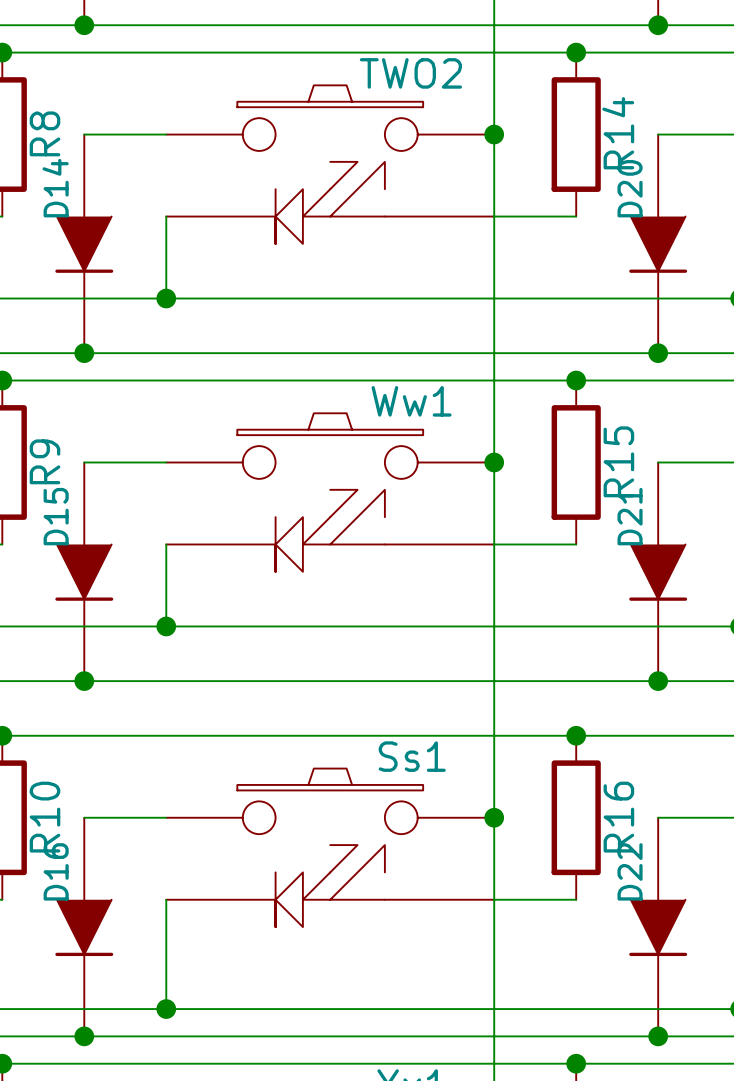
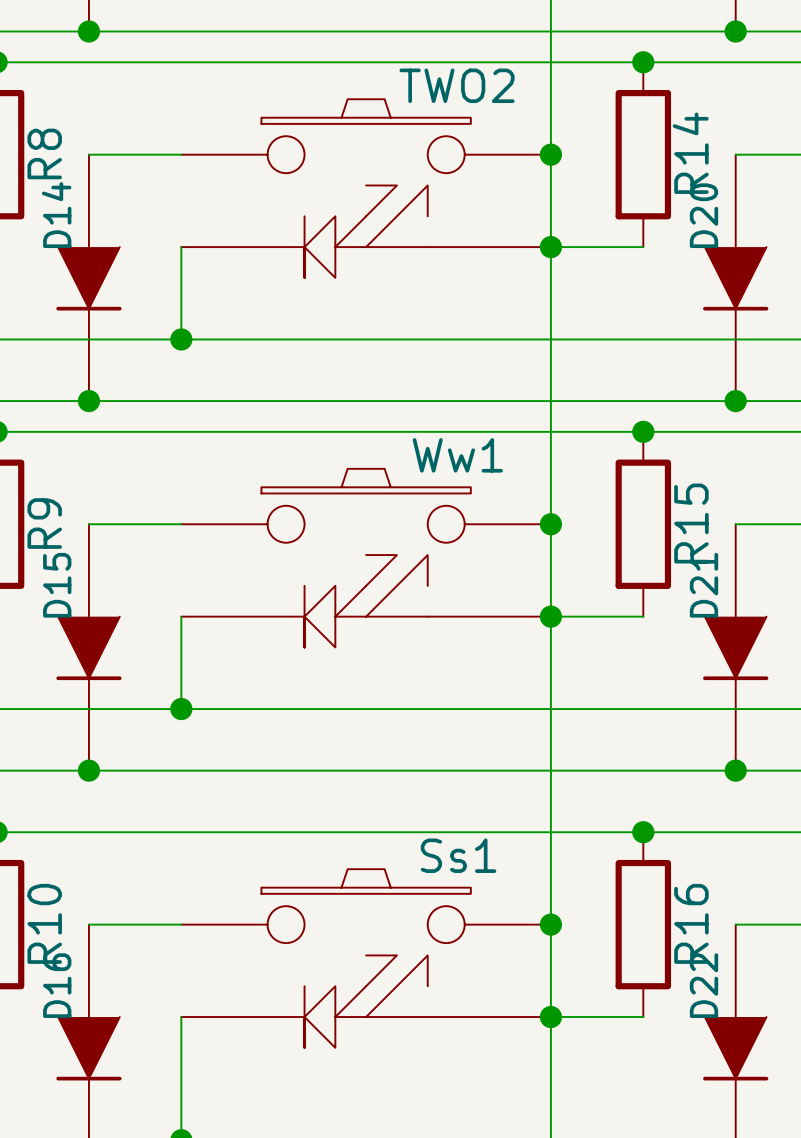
junction: none -> (550, 247)
junction: none -> (550, 616)
junction: none -> (550, 1017)

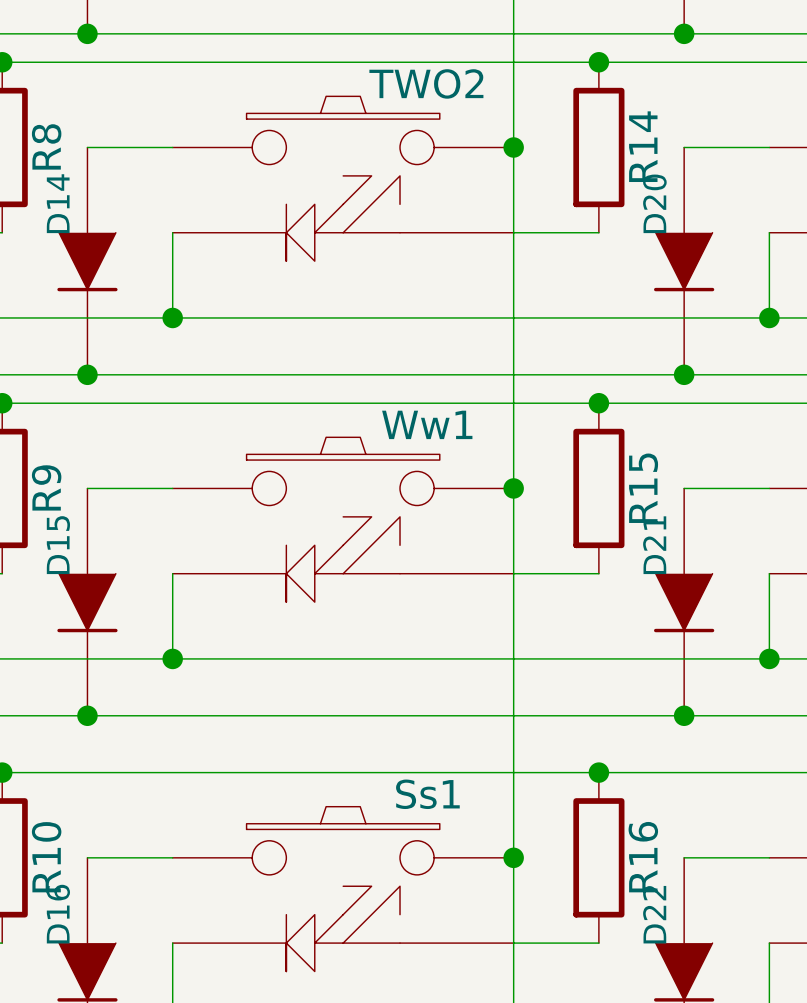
junction: (550, 247) -> none
junction: (550, 616) -> none
junction: (550, 1017) -> none

